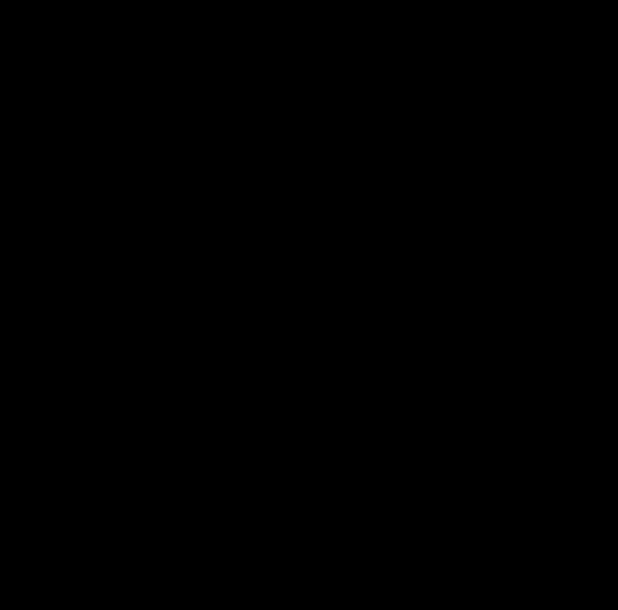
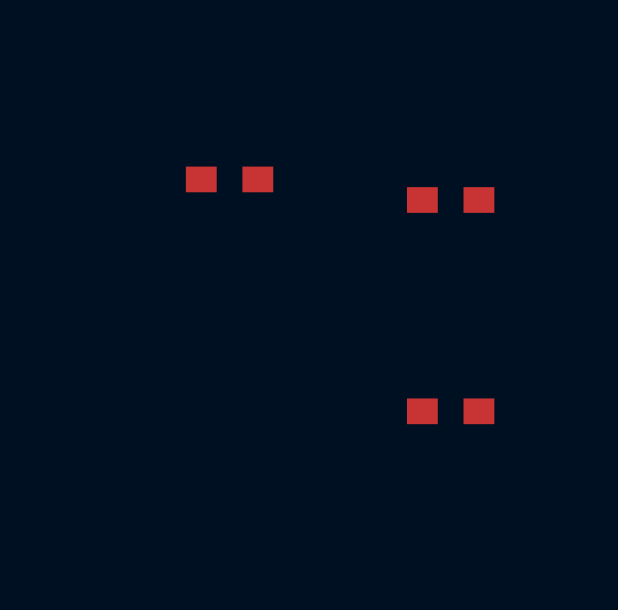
part: none -> (229, 179)
part: none -> (450, 199)
part: none -> (450, 411)

